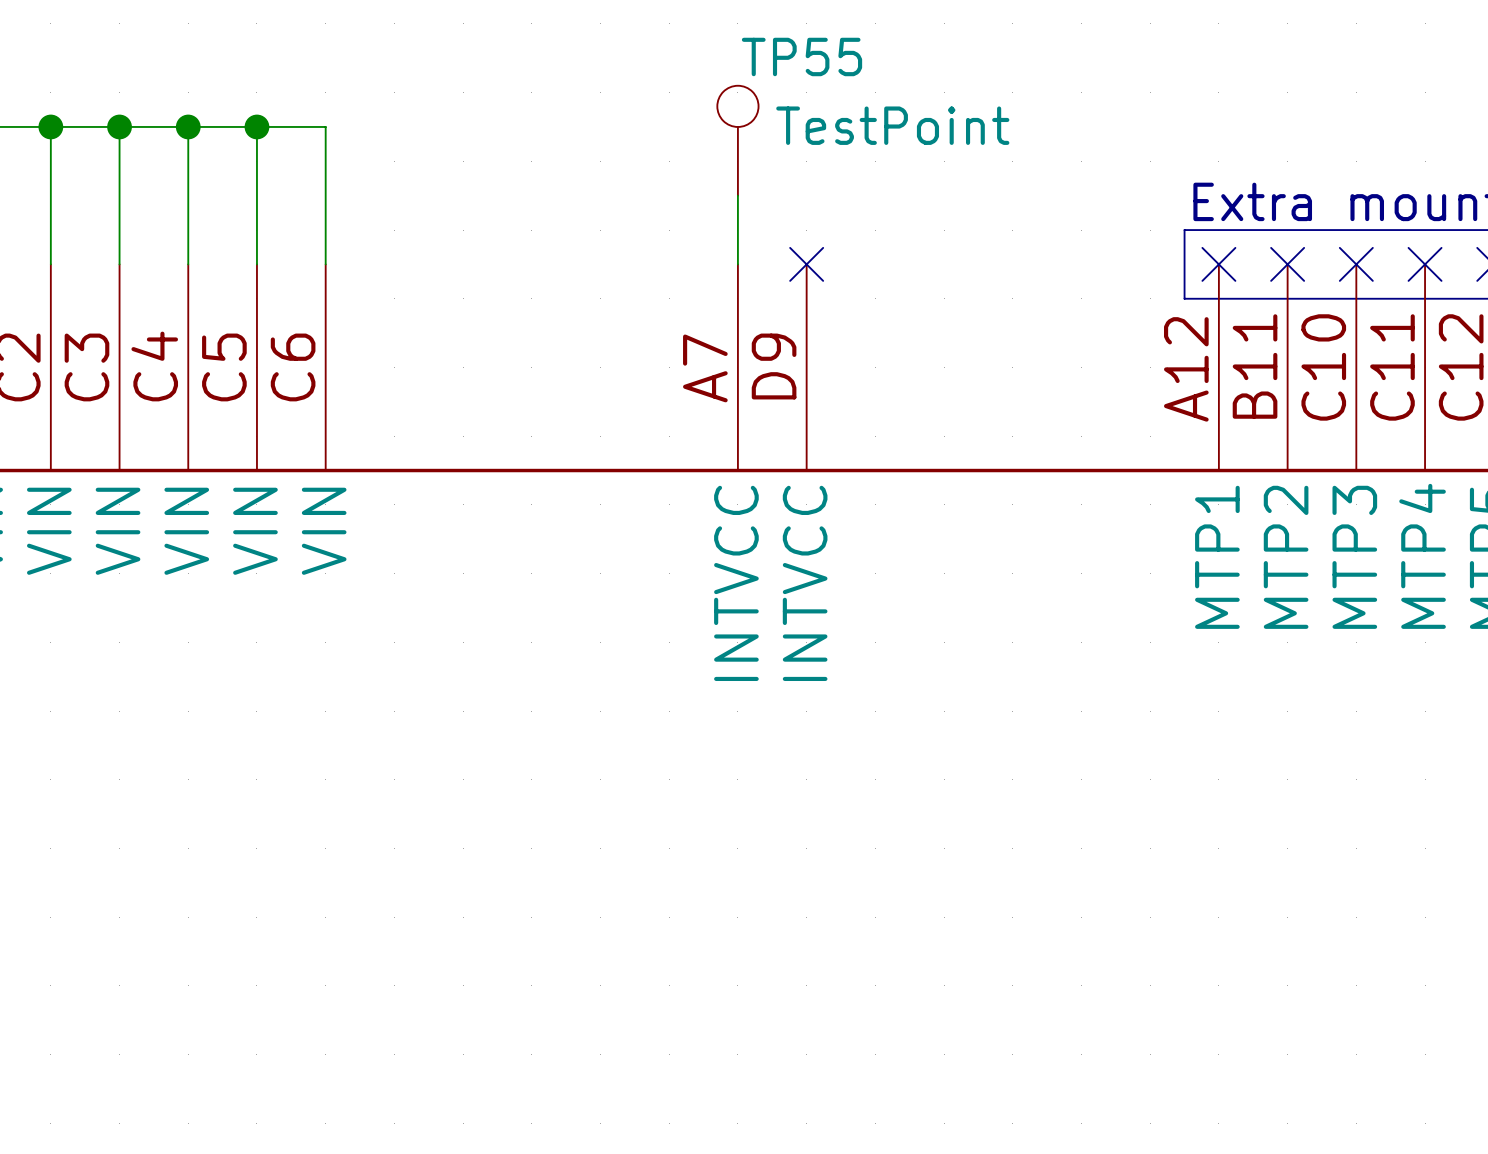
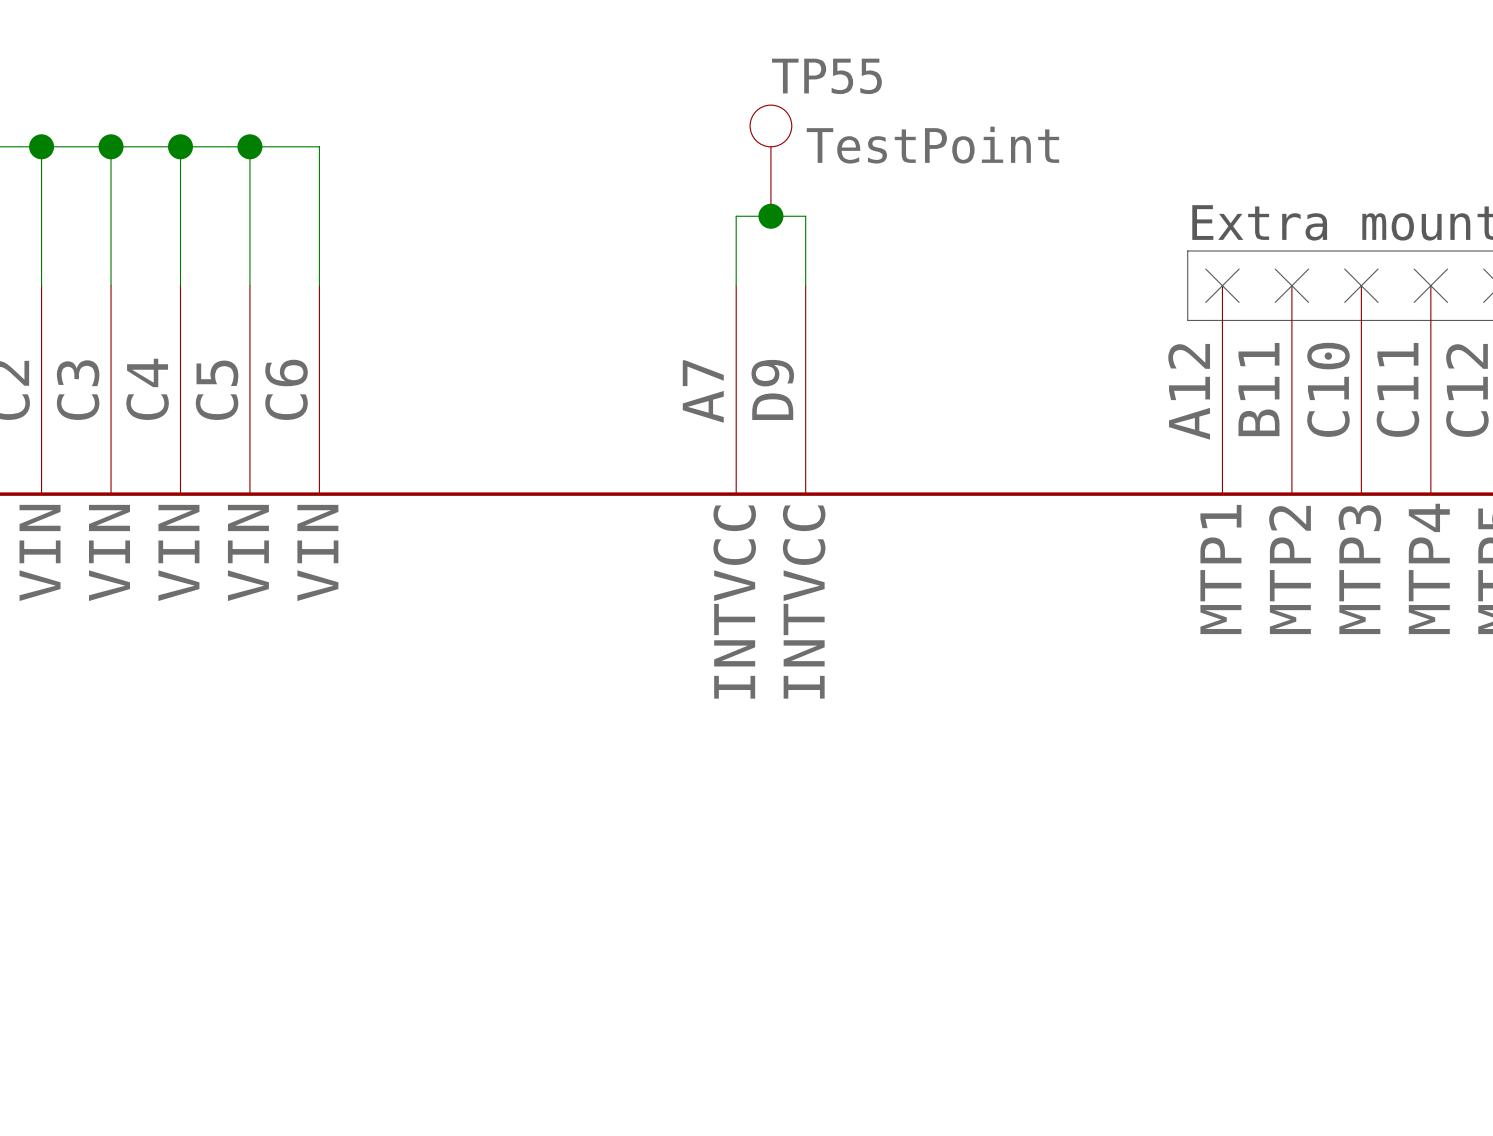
TP55 position: (737, 140) -> (770, 160)
wire: none -> (736, 216) (805, 216) (805, 285)
junction: none -> (770, 216)
no-connect mark: (806, 264) -> none

